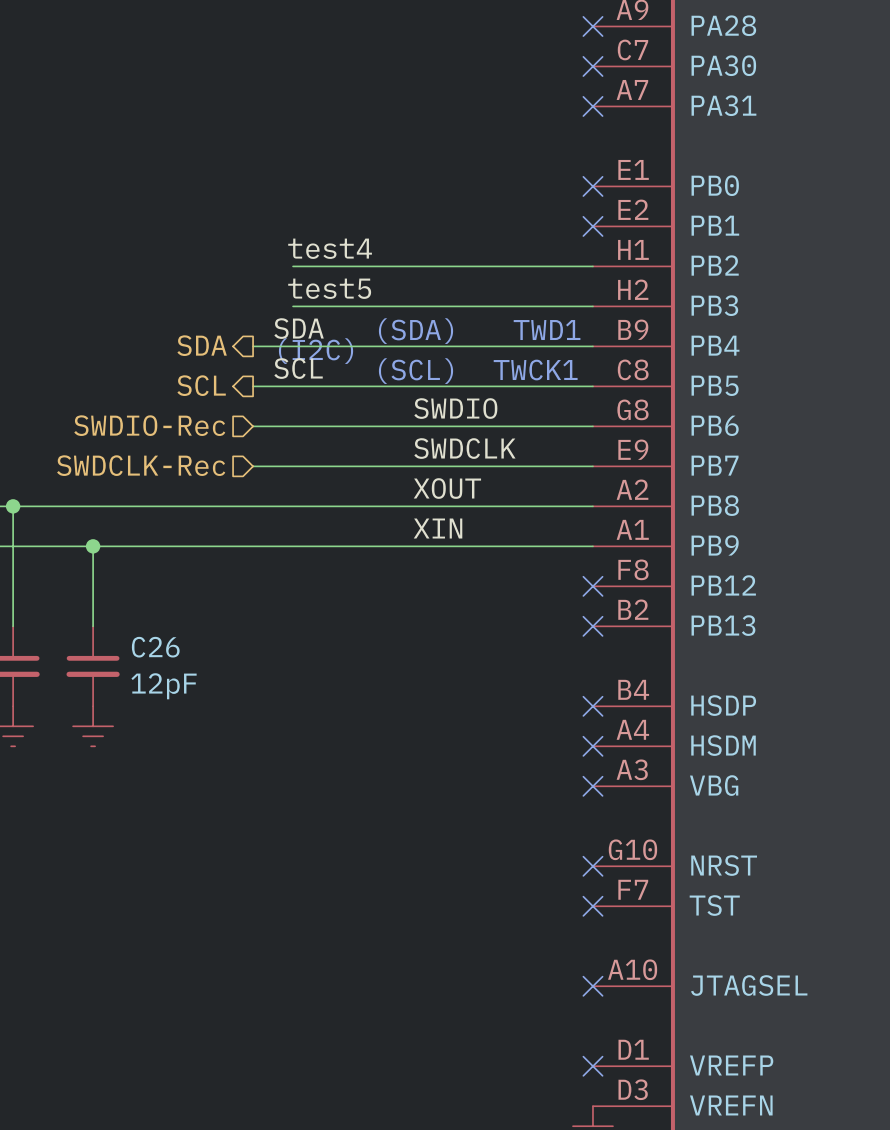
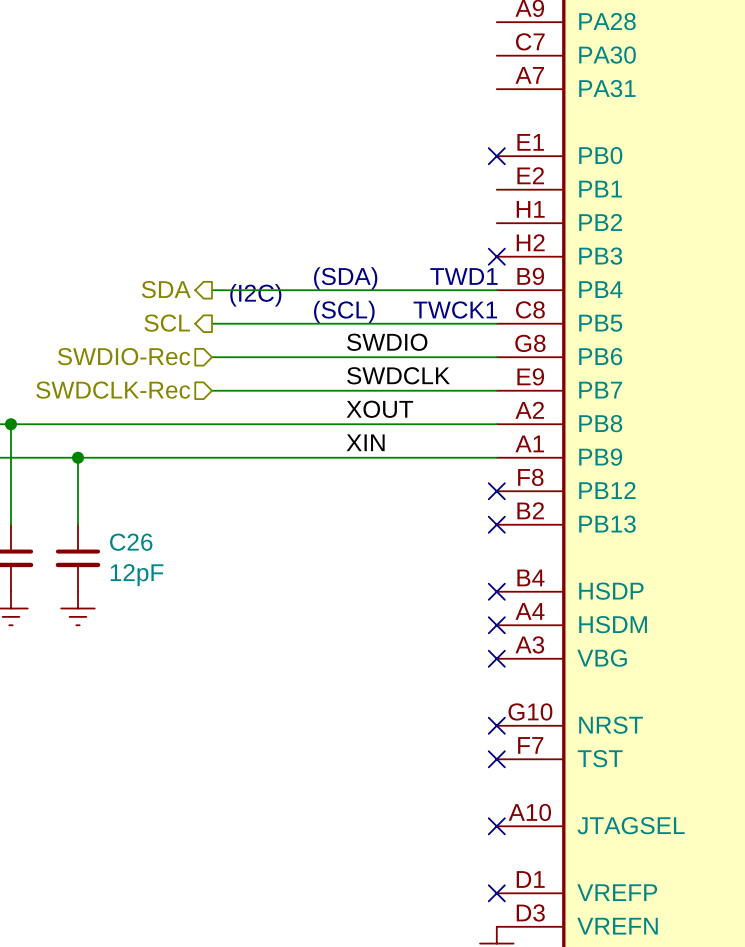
no-connect mark: (592, 26) -> none
no-connect mark: (592, 66) -> none
no-connect mark: (592, 106) -> none
no-connect mark position: (592, 226) -> (496, 256)
label: test4 (330, 248) -> none
wire: (293, 266) (592, 266) -> none
label: test5 (329, 288) -> none
wire: (293, 306) (592, 306) -> none
label: SDA (299, 328) -> none
label: SCL (298, 368) -> none

